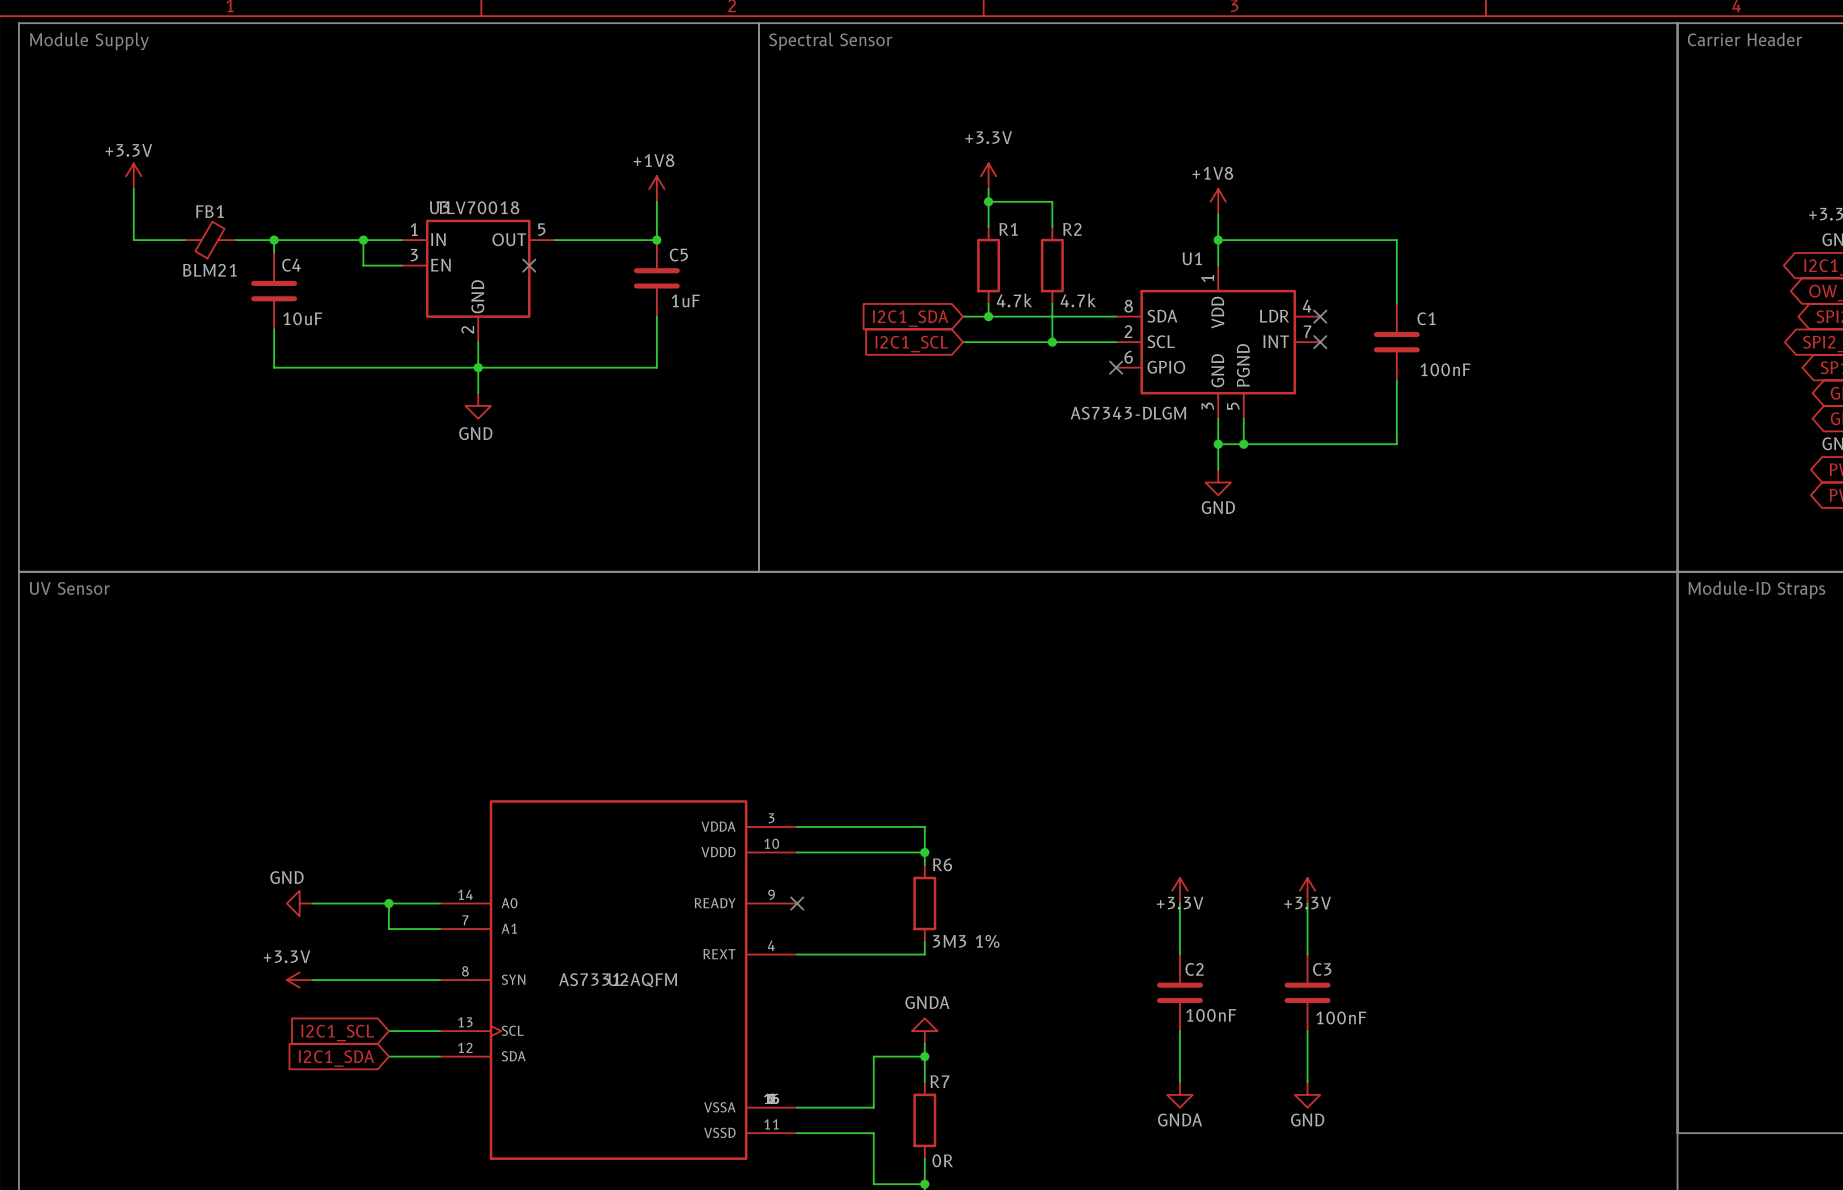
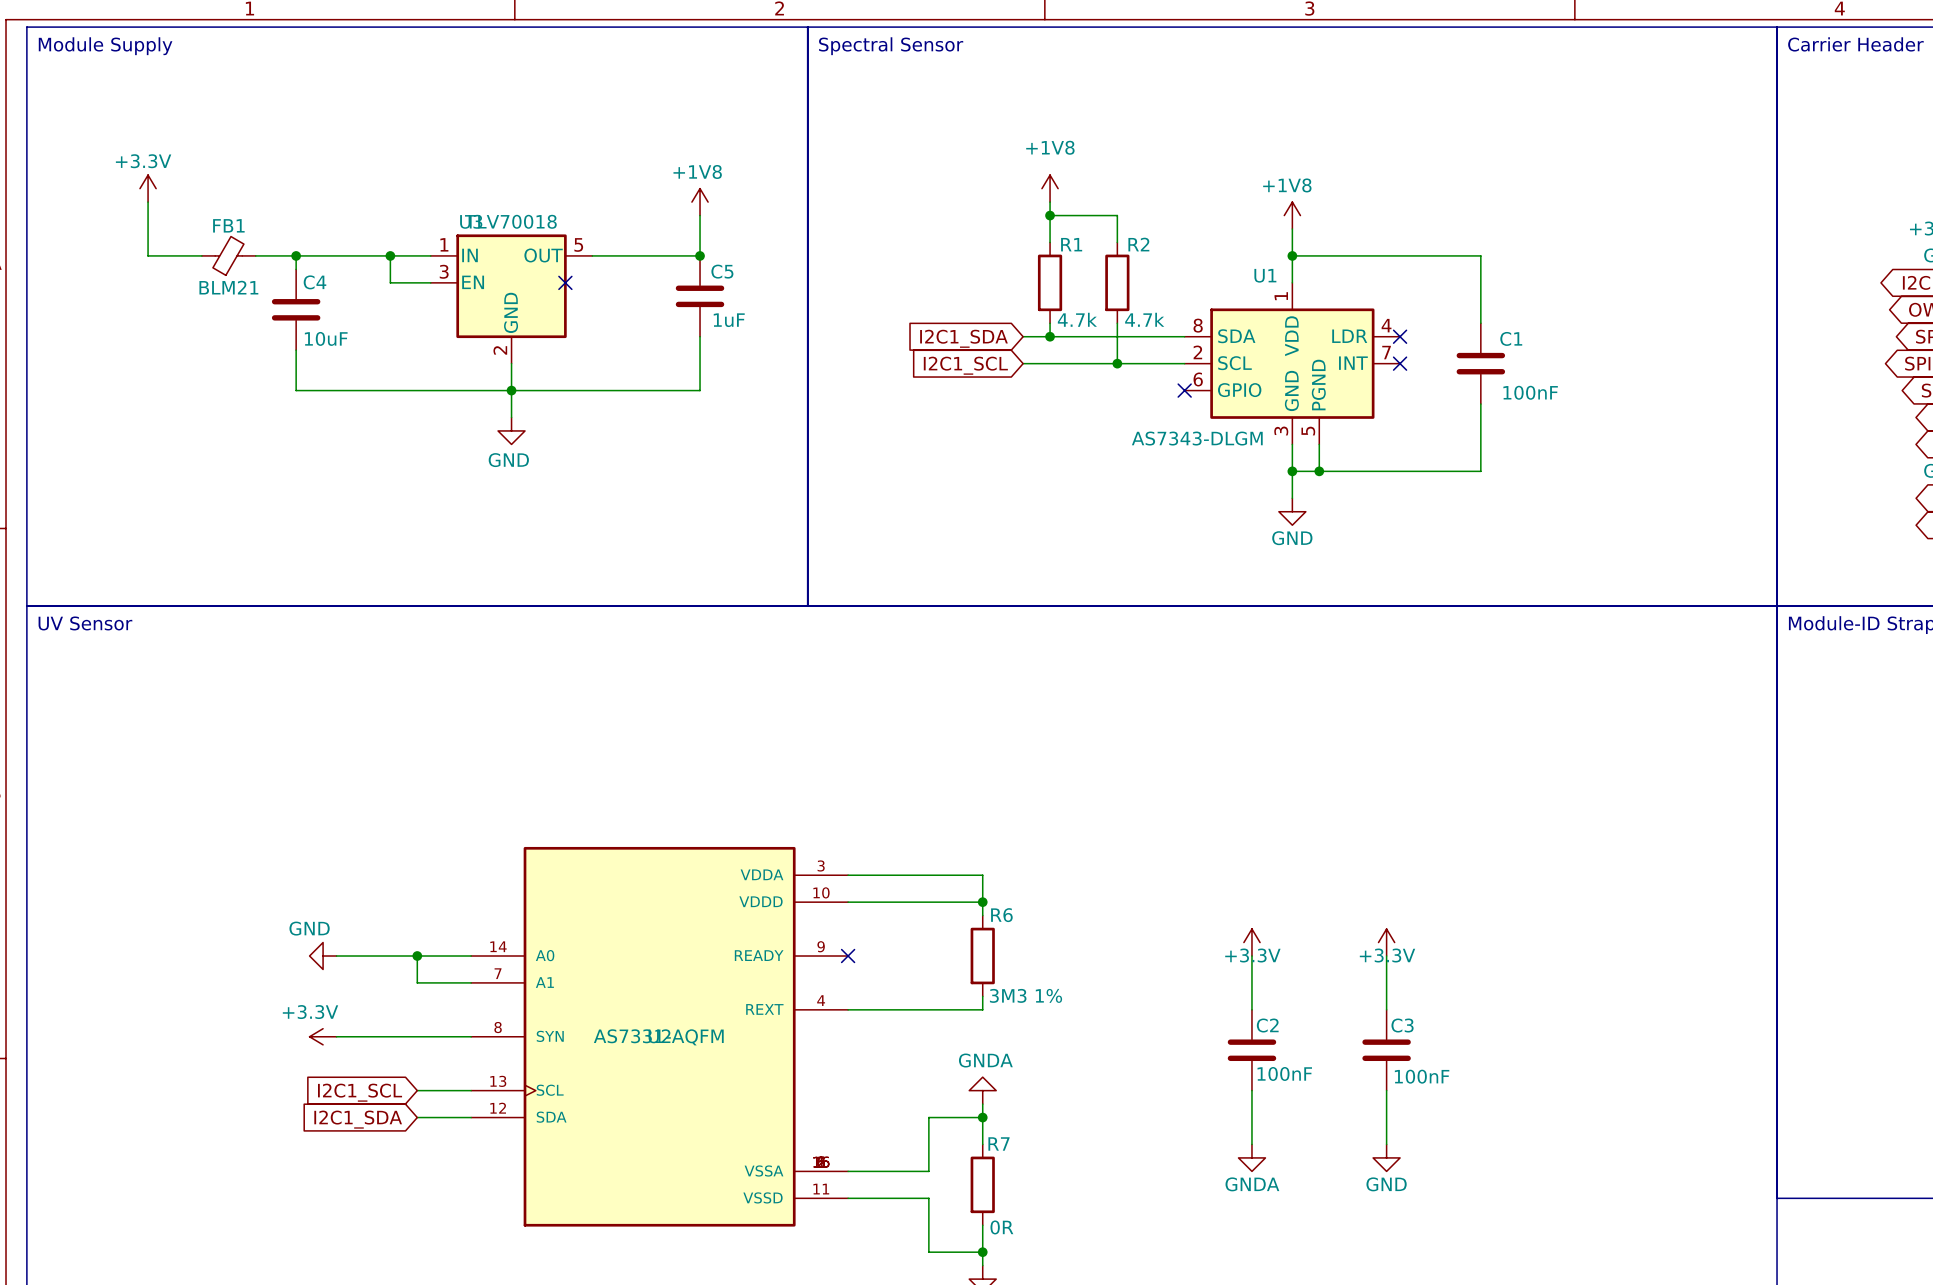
power symbol: +3.3V (988, 176) -> +1V8 (1050, 188)

